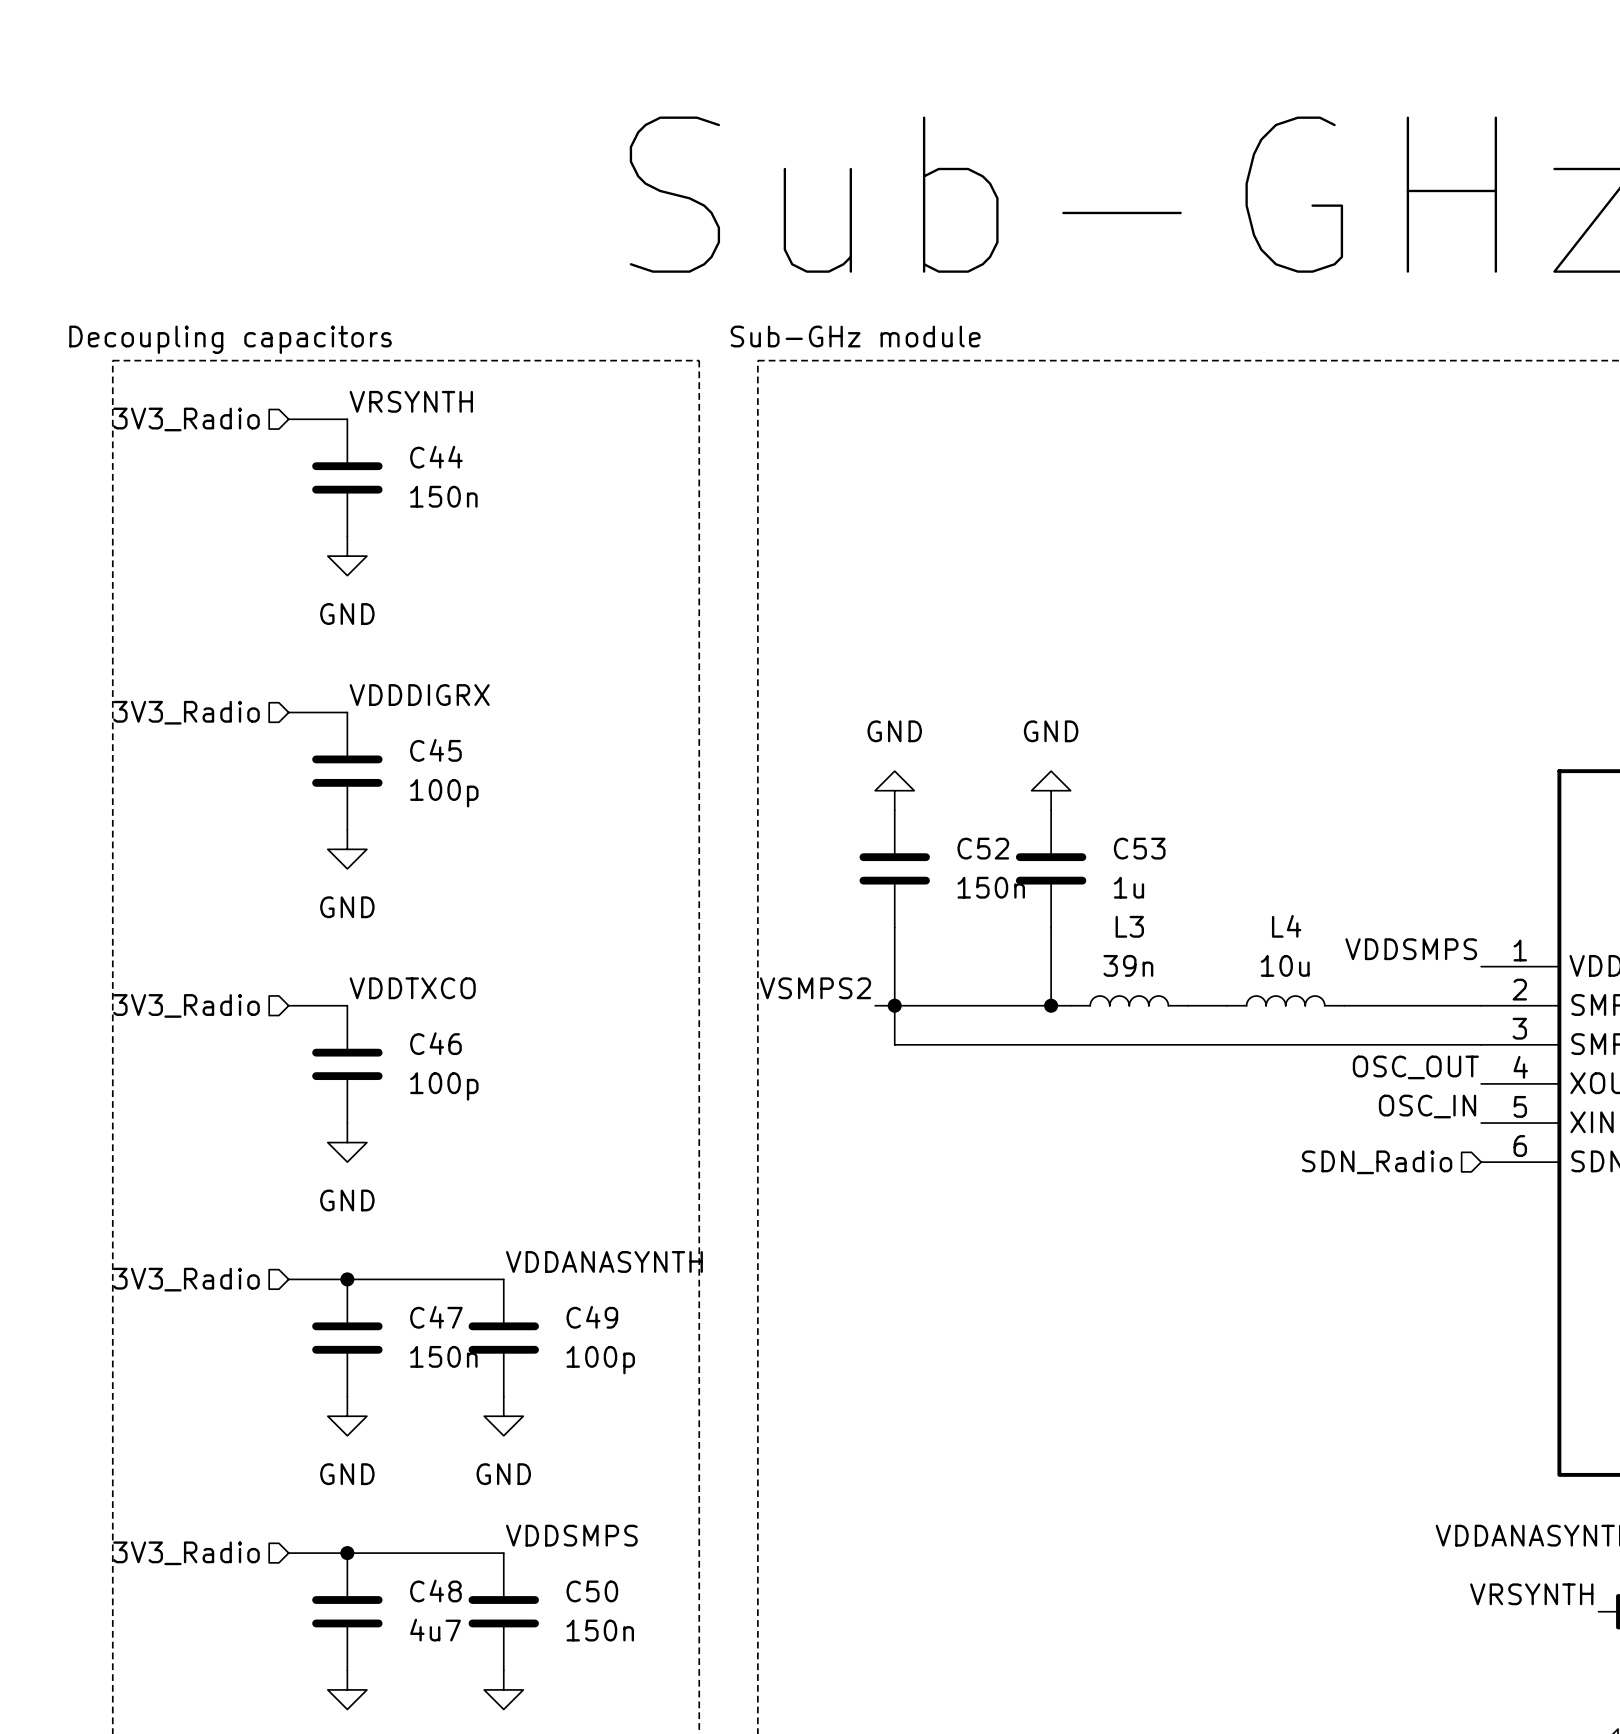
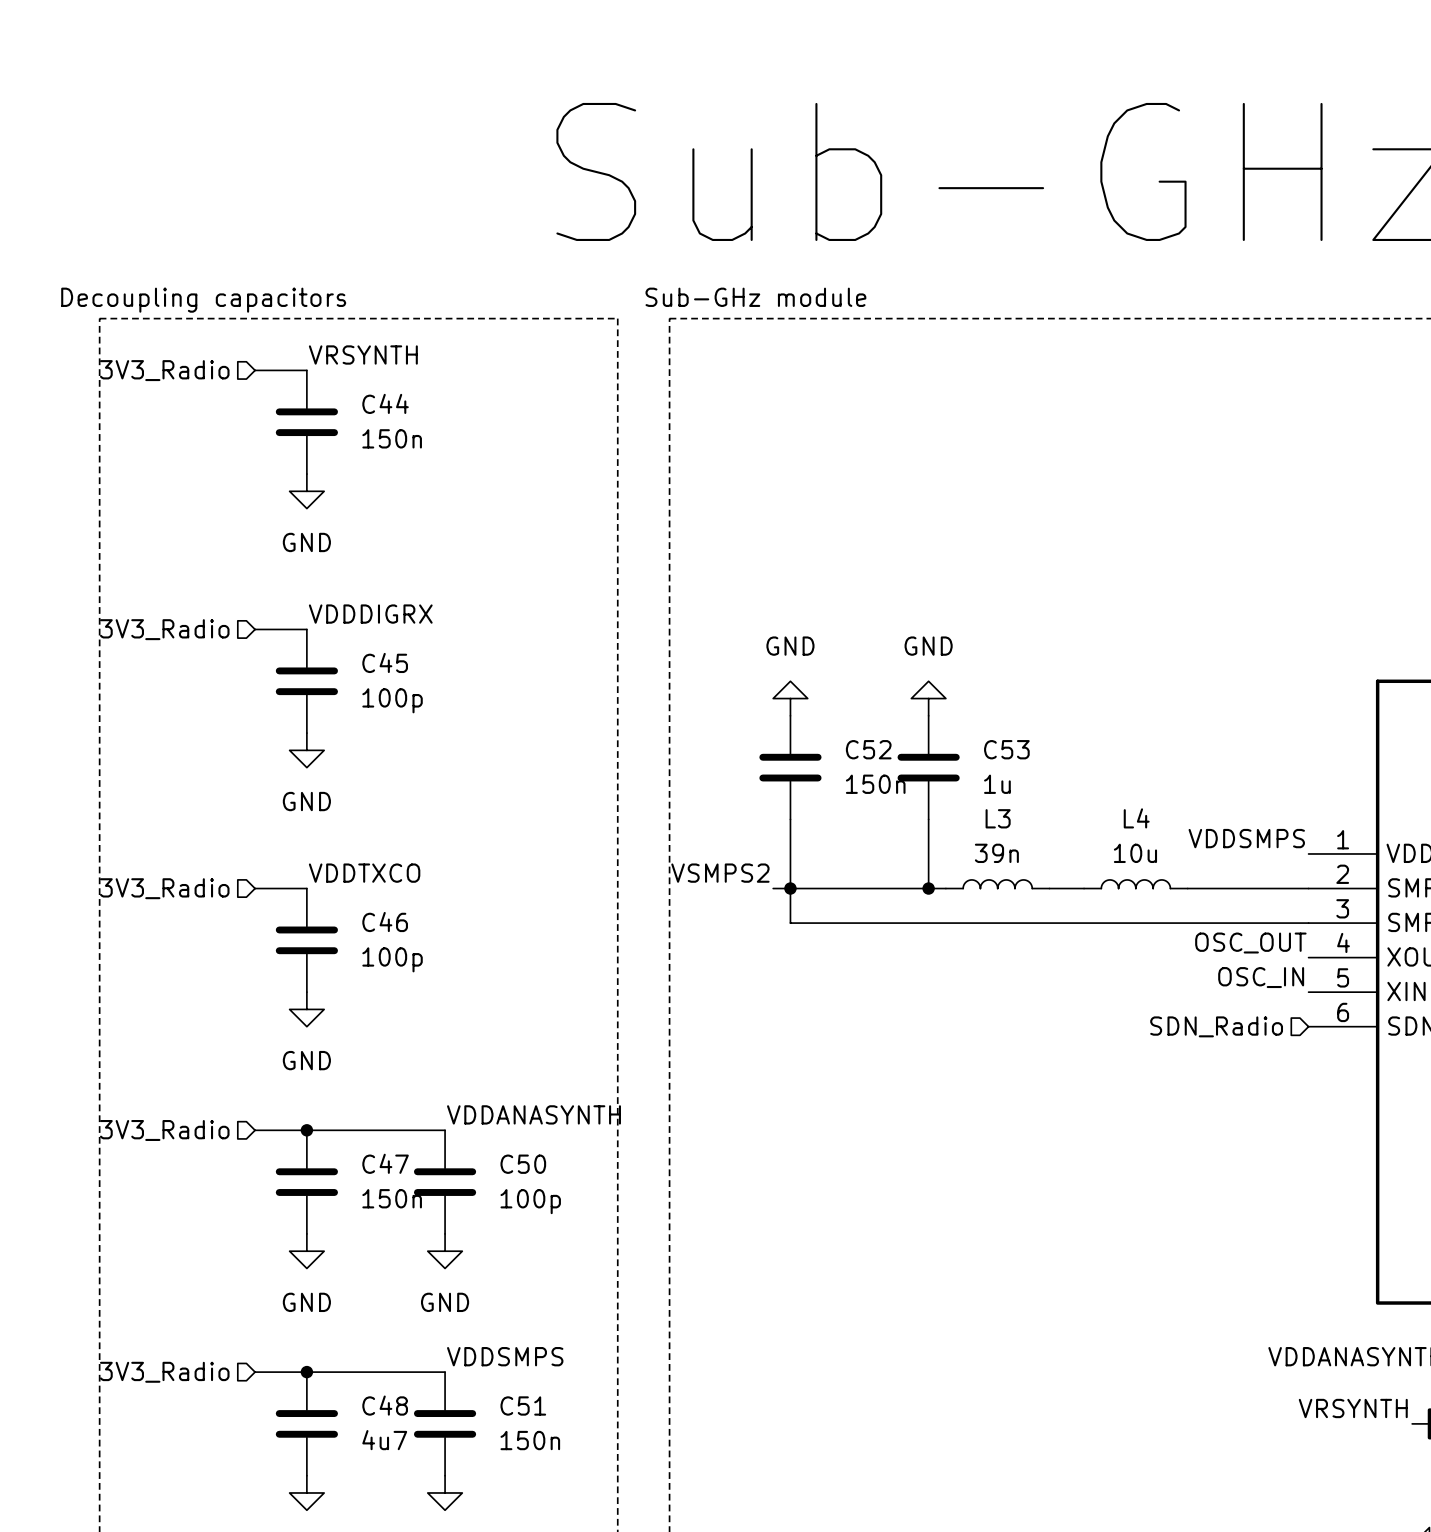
C49 name: C49 (592, 1317) -> C50 (523, 1164)
C50 name: C50 (592, 1591) -> C51 (523, 1405)

